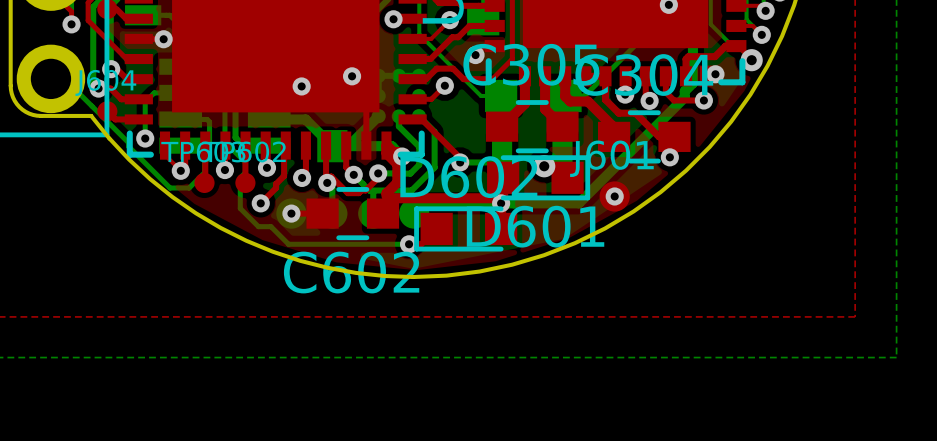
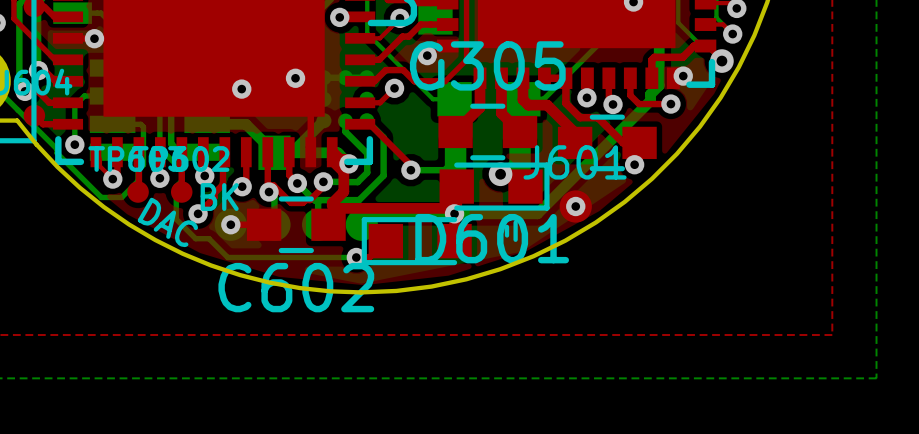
C304 name: C304 (644, 75) -> none
D602 name: D602 (468, 177) -> none
text: none -> BK (219, 197)
text: none -> DAC (167, 222)
line: none -> (515, 222) (515, 239)
line: none -> (507, 226) (507, 235)

